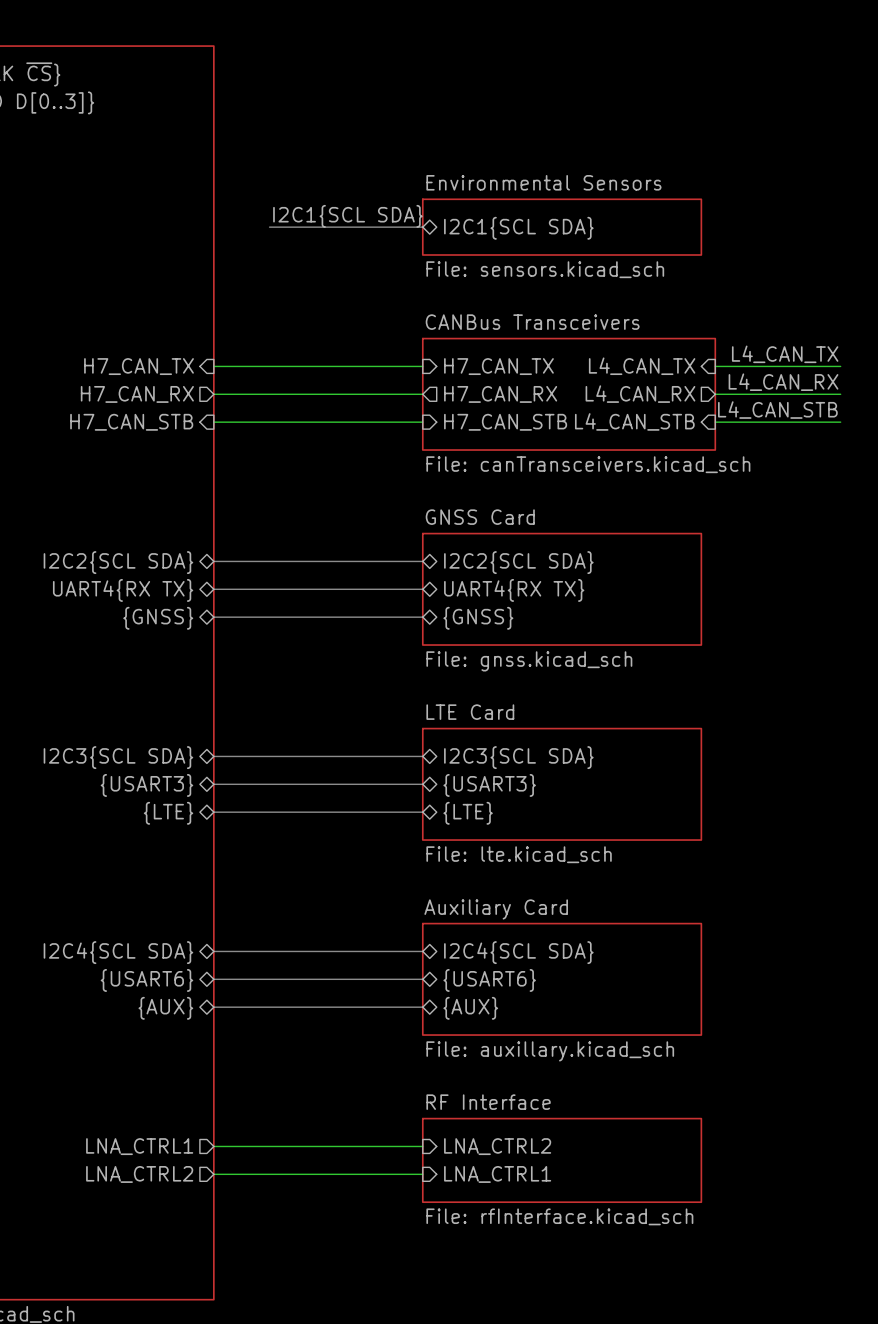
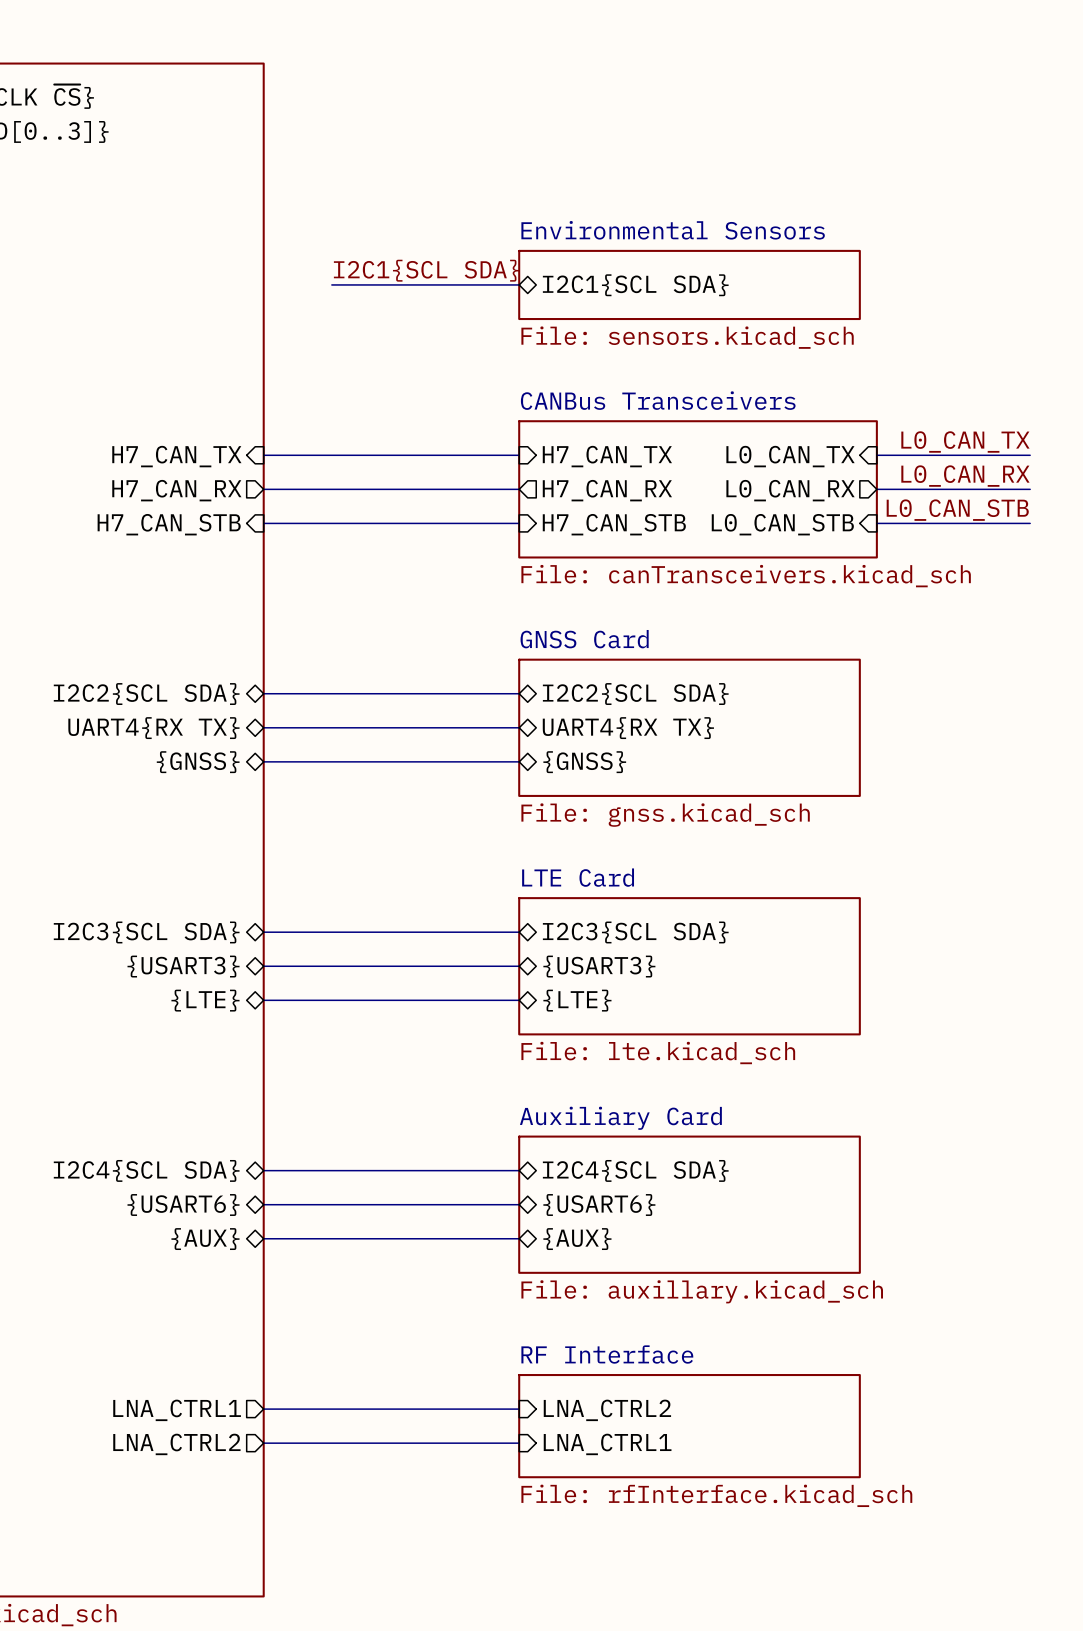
label: L4_CAN_TX (785, 354) -> L0_CAN_TX (965, 442)
sheet pin: L4_CAN_TX (642, 366) -> L0_CAN_TX (790, 456)
label: L4_CAN_RX (783, 382) -> L0_CAN_RX (965, 476)
sheet pin: L4_CAN_RX (640, 394) -> L0_CAN_RX (790, 490)
label: L4_CAN_STB (777, 410) -> L0_CAN_STB (957, 510)
sheet pin: L4_CAN_STB (634, 421) -> L0_CAN_STB (782, 524)

